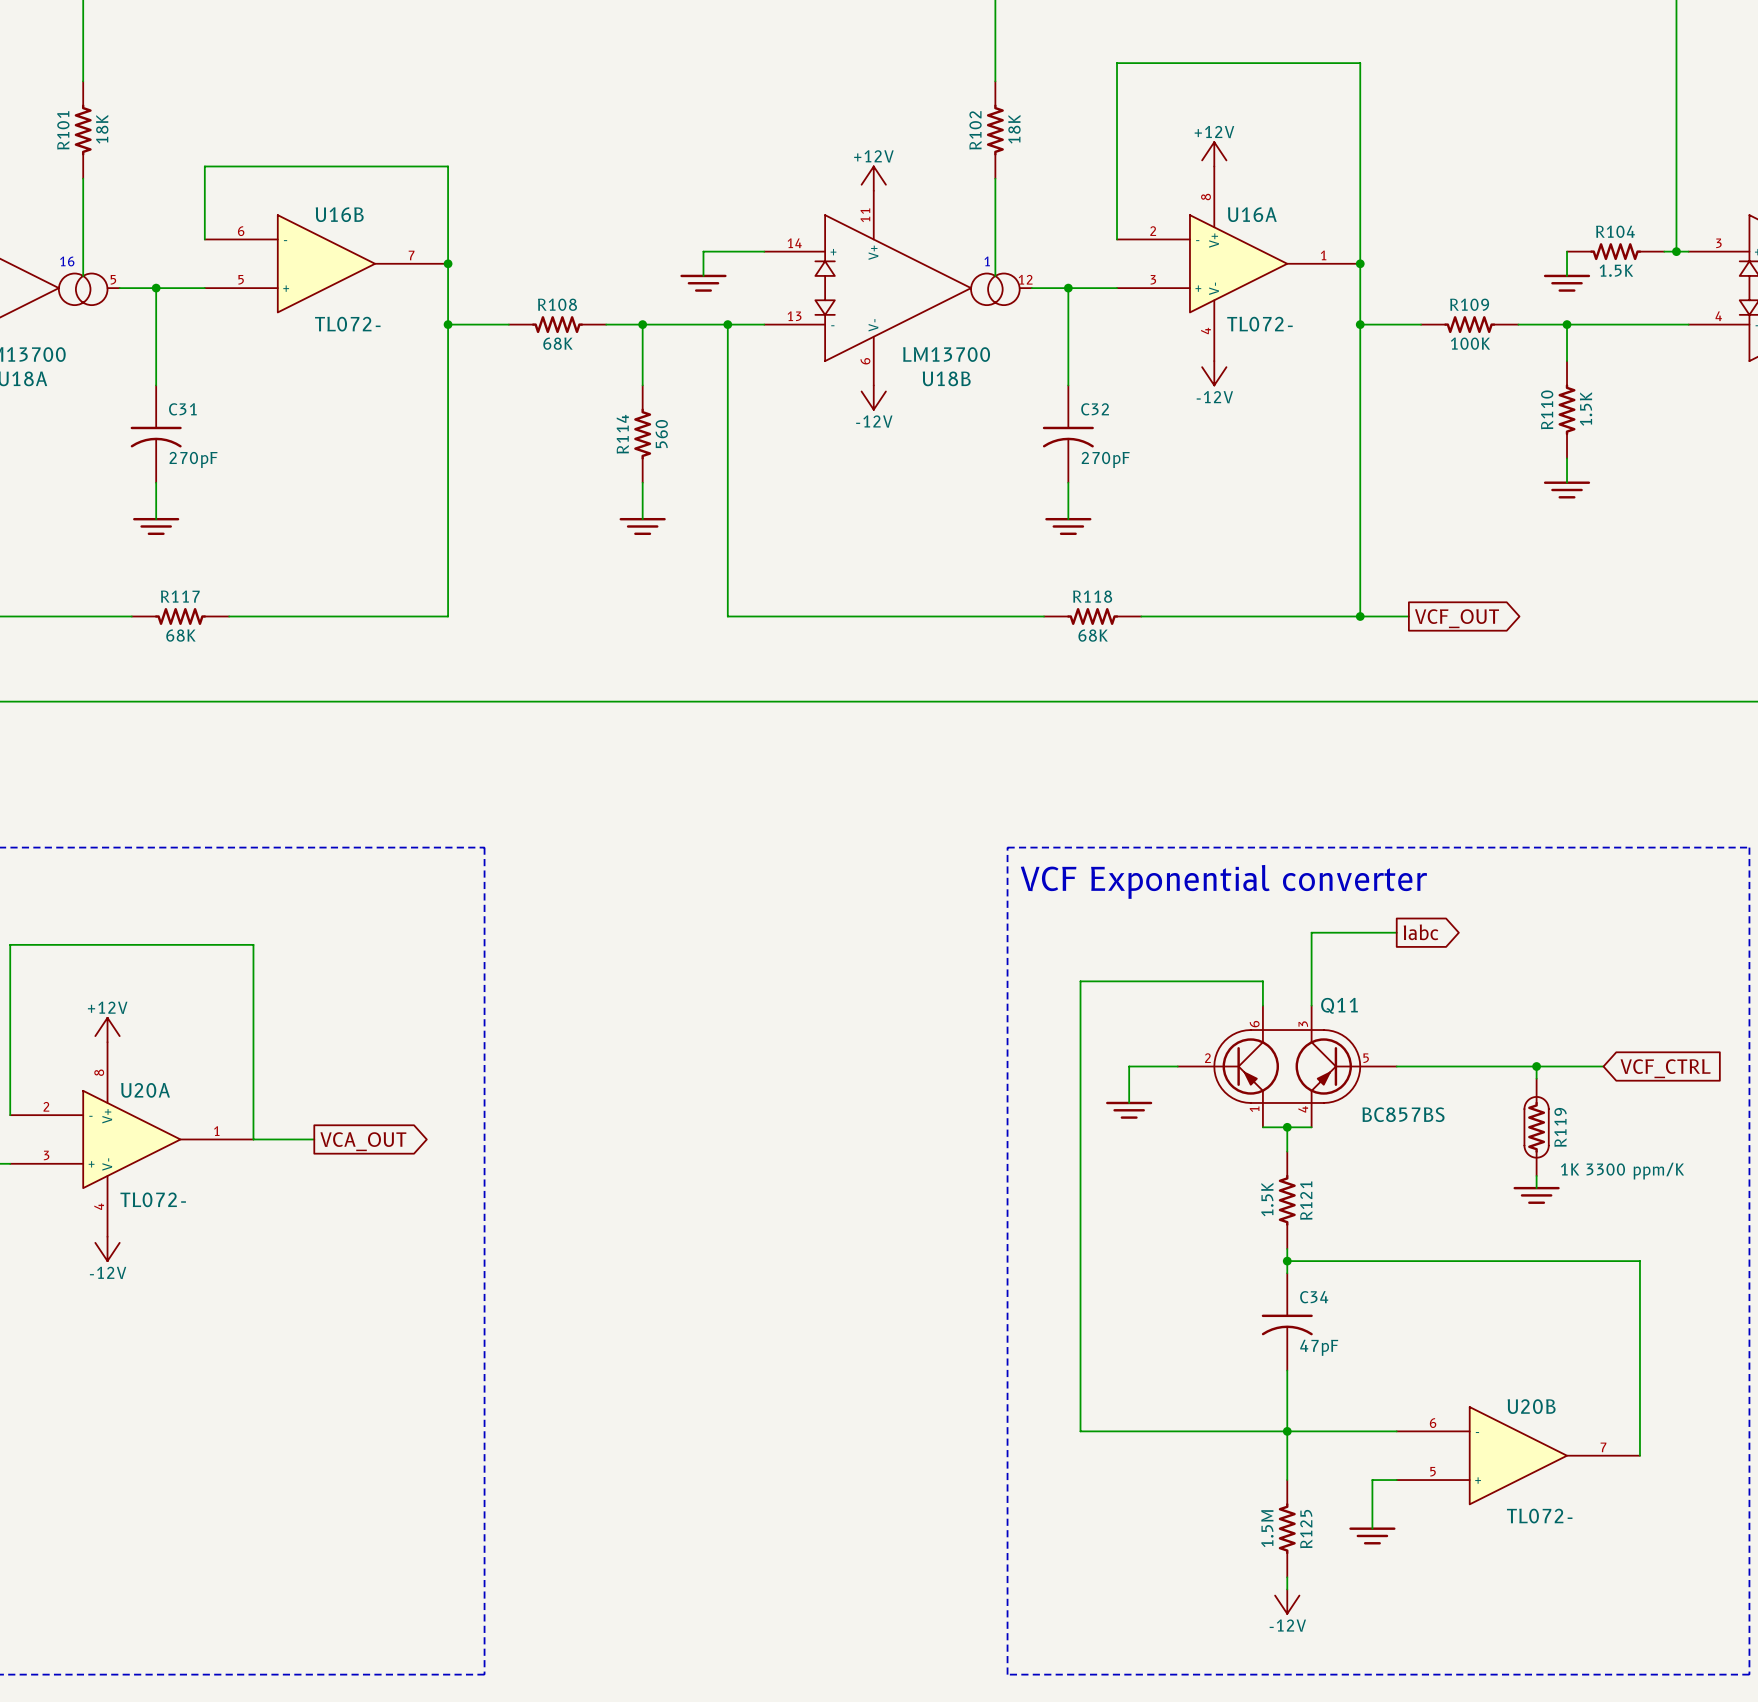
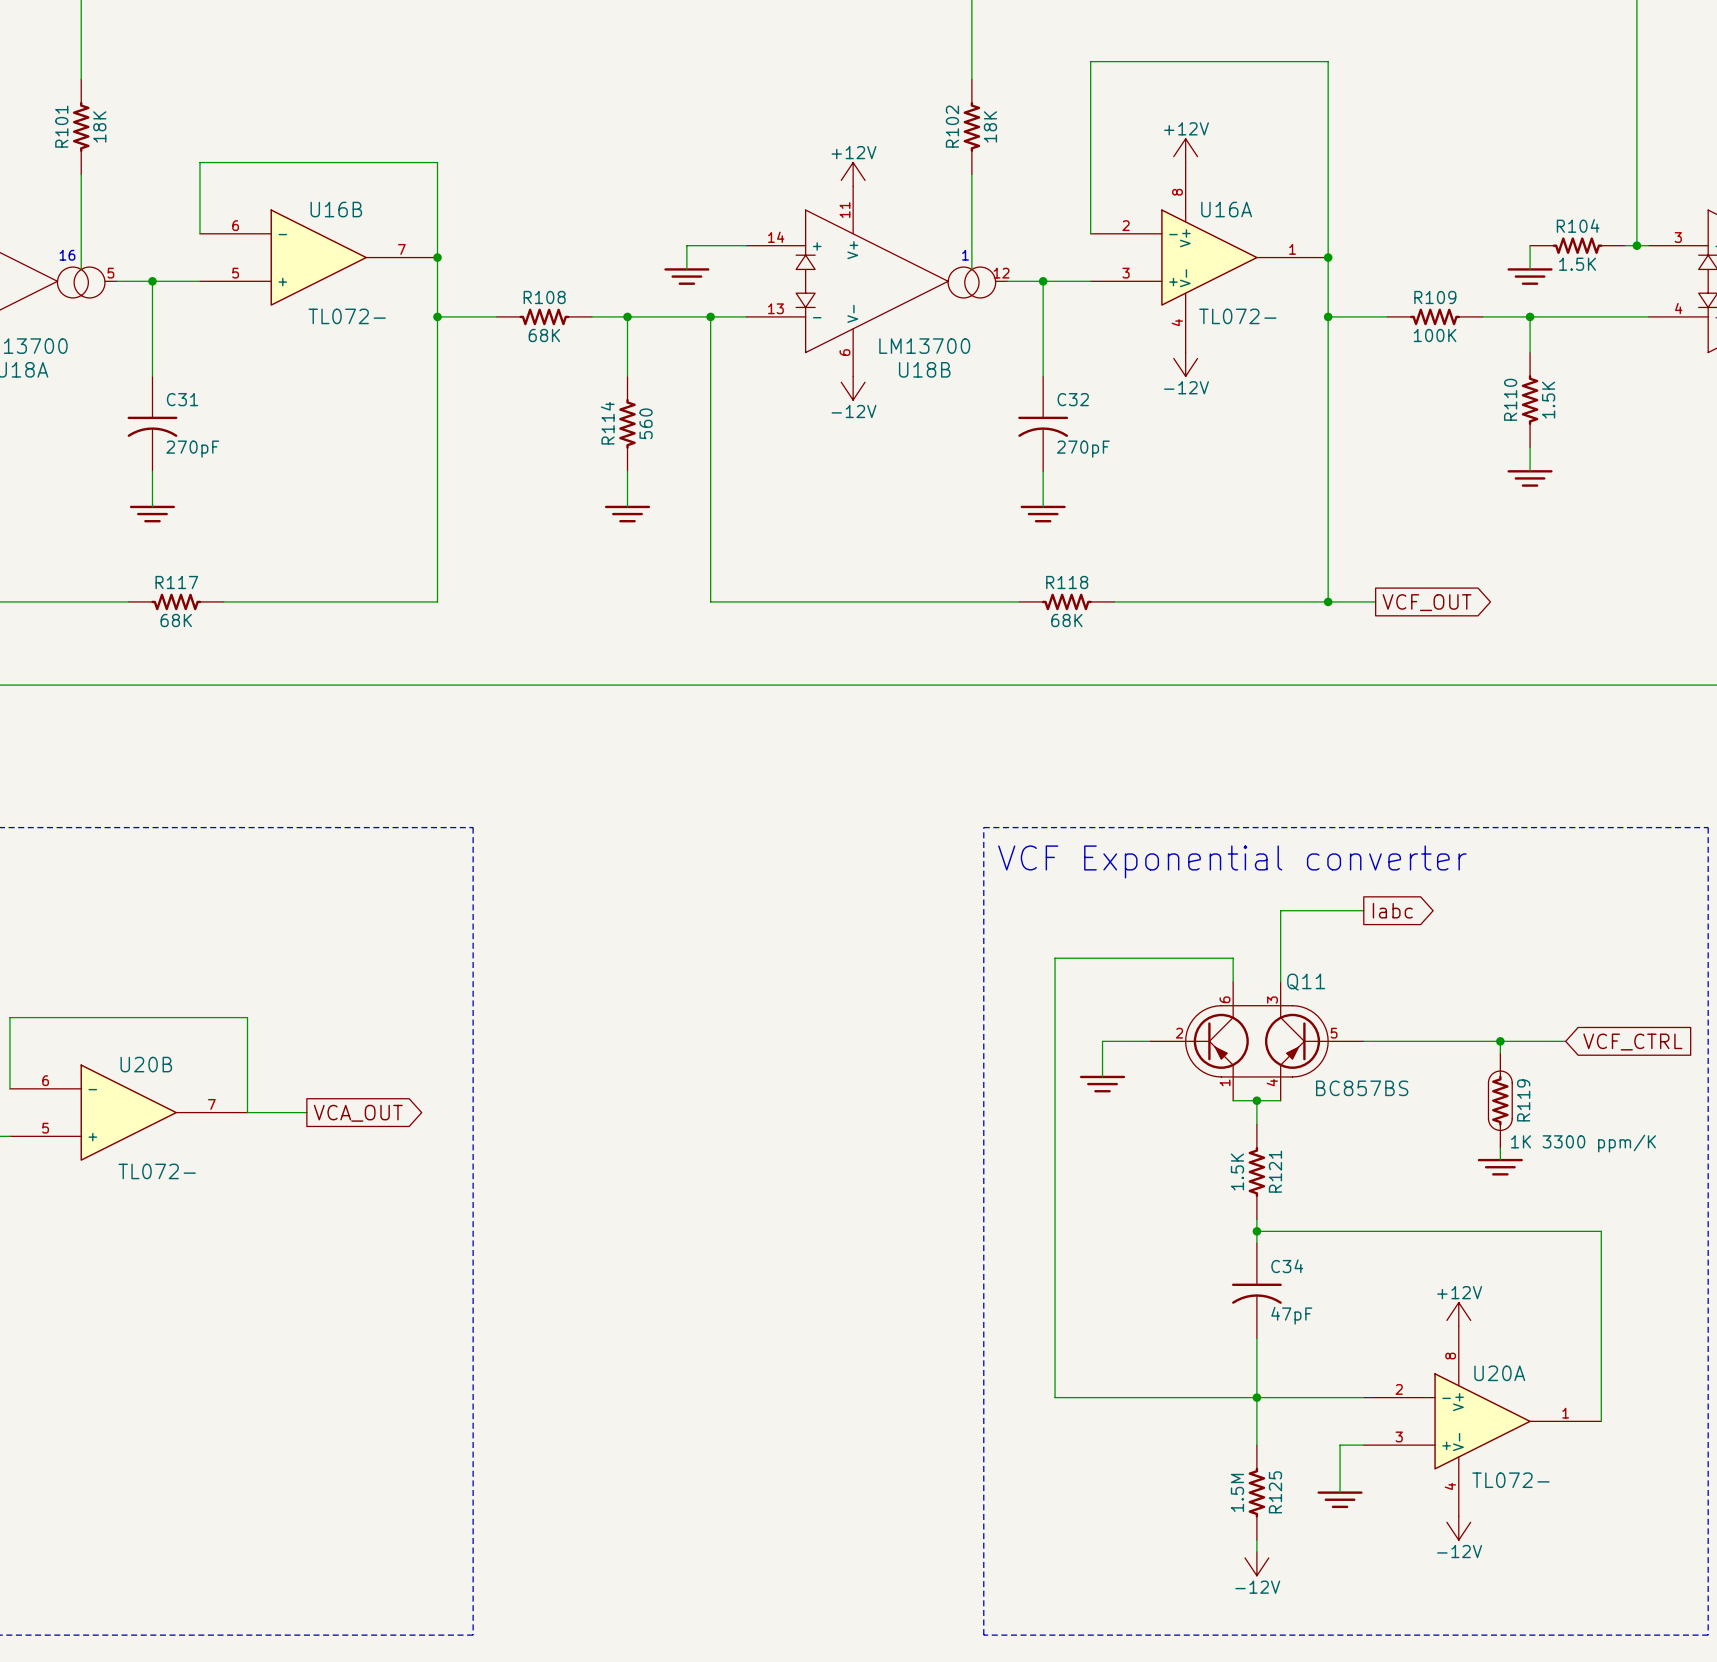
power symbol: +12V (107, 1030) -> none
wire: (10, 1042) (10, 944) (253, 944) (253, 1042) -> (9, 1017) (247, 1017)
U20A position: (131, 1139) -> (1482, 1421)
power symbol: -12V (107, 1248) -> none
power symbol: none -> +12V (1458, 1314)
U20B position: (1518, 1455) -> (128, 1112)
power symbol: none -> -12V (1458, 1528)

